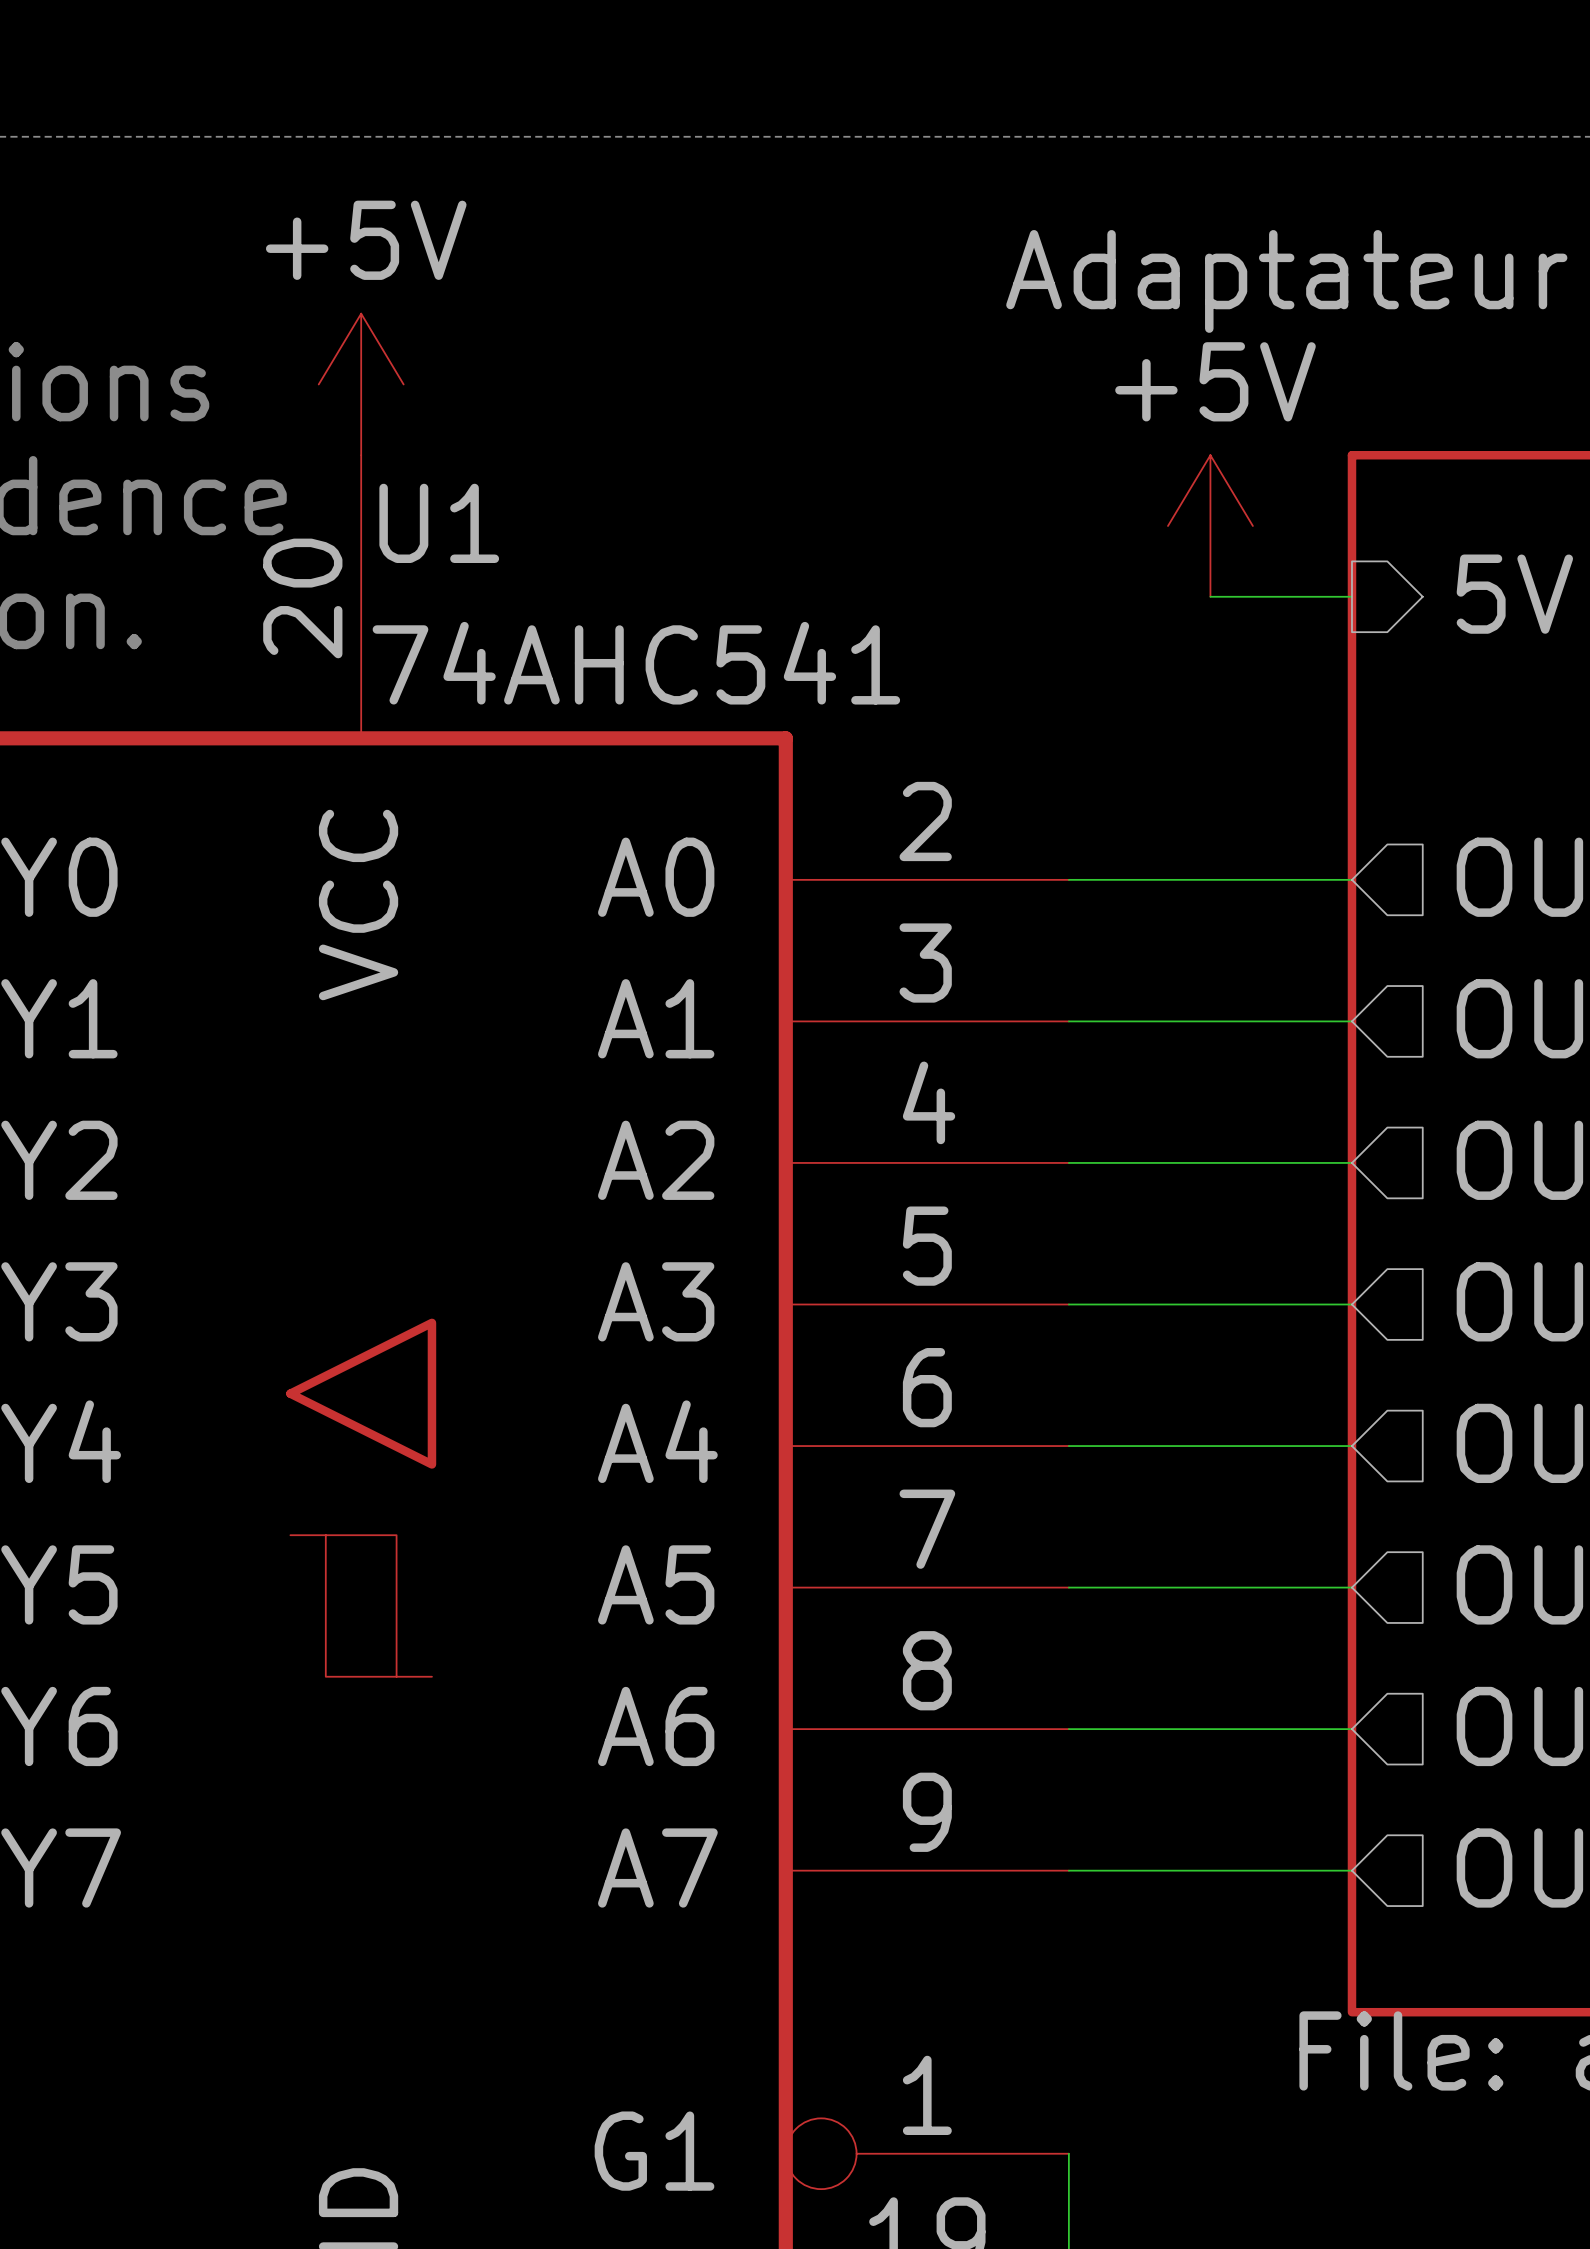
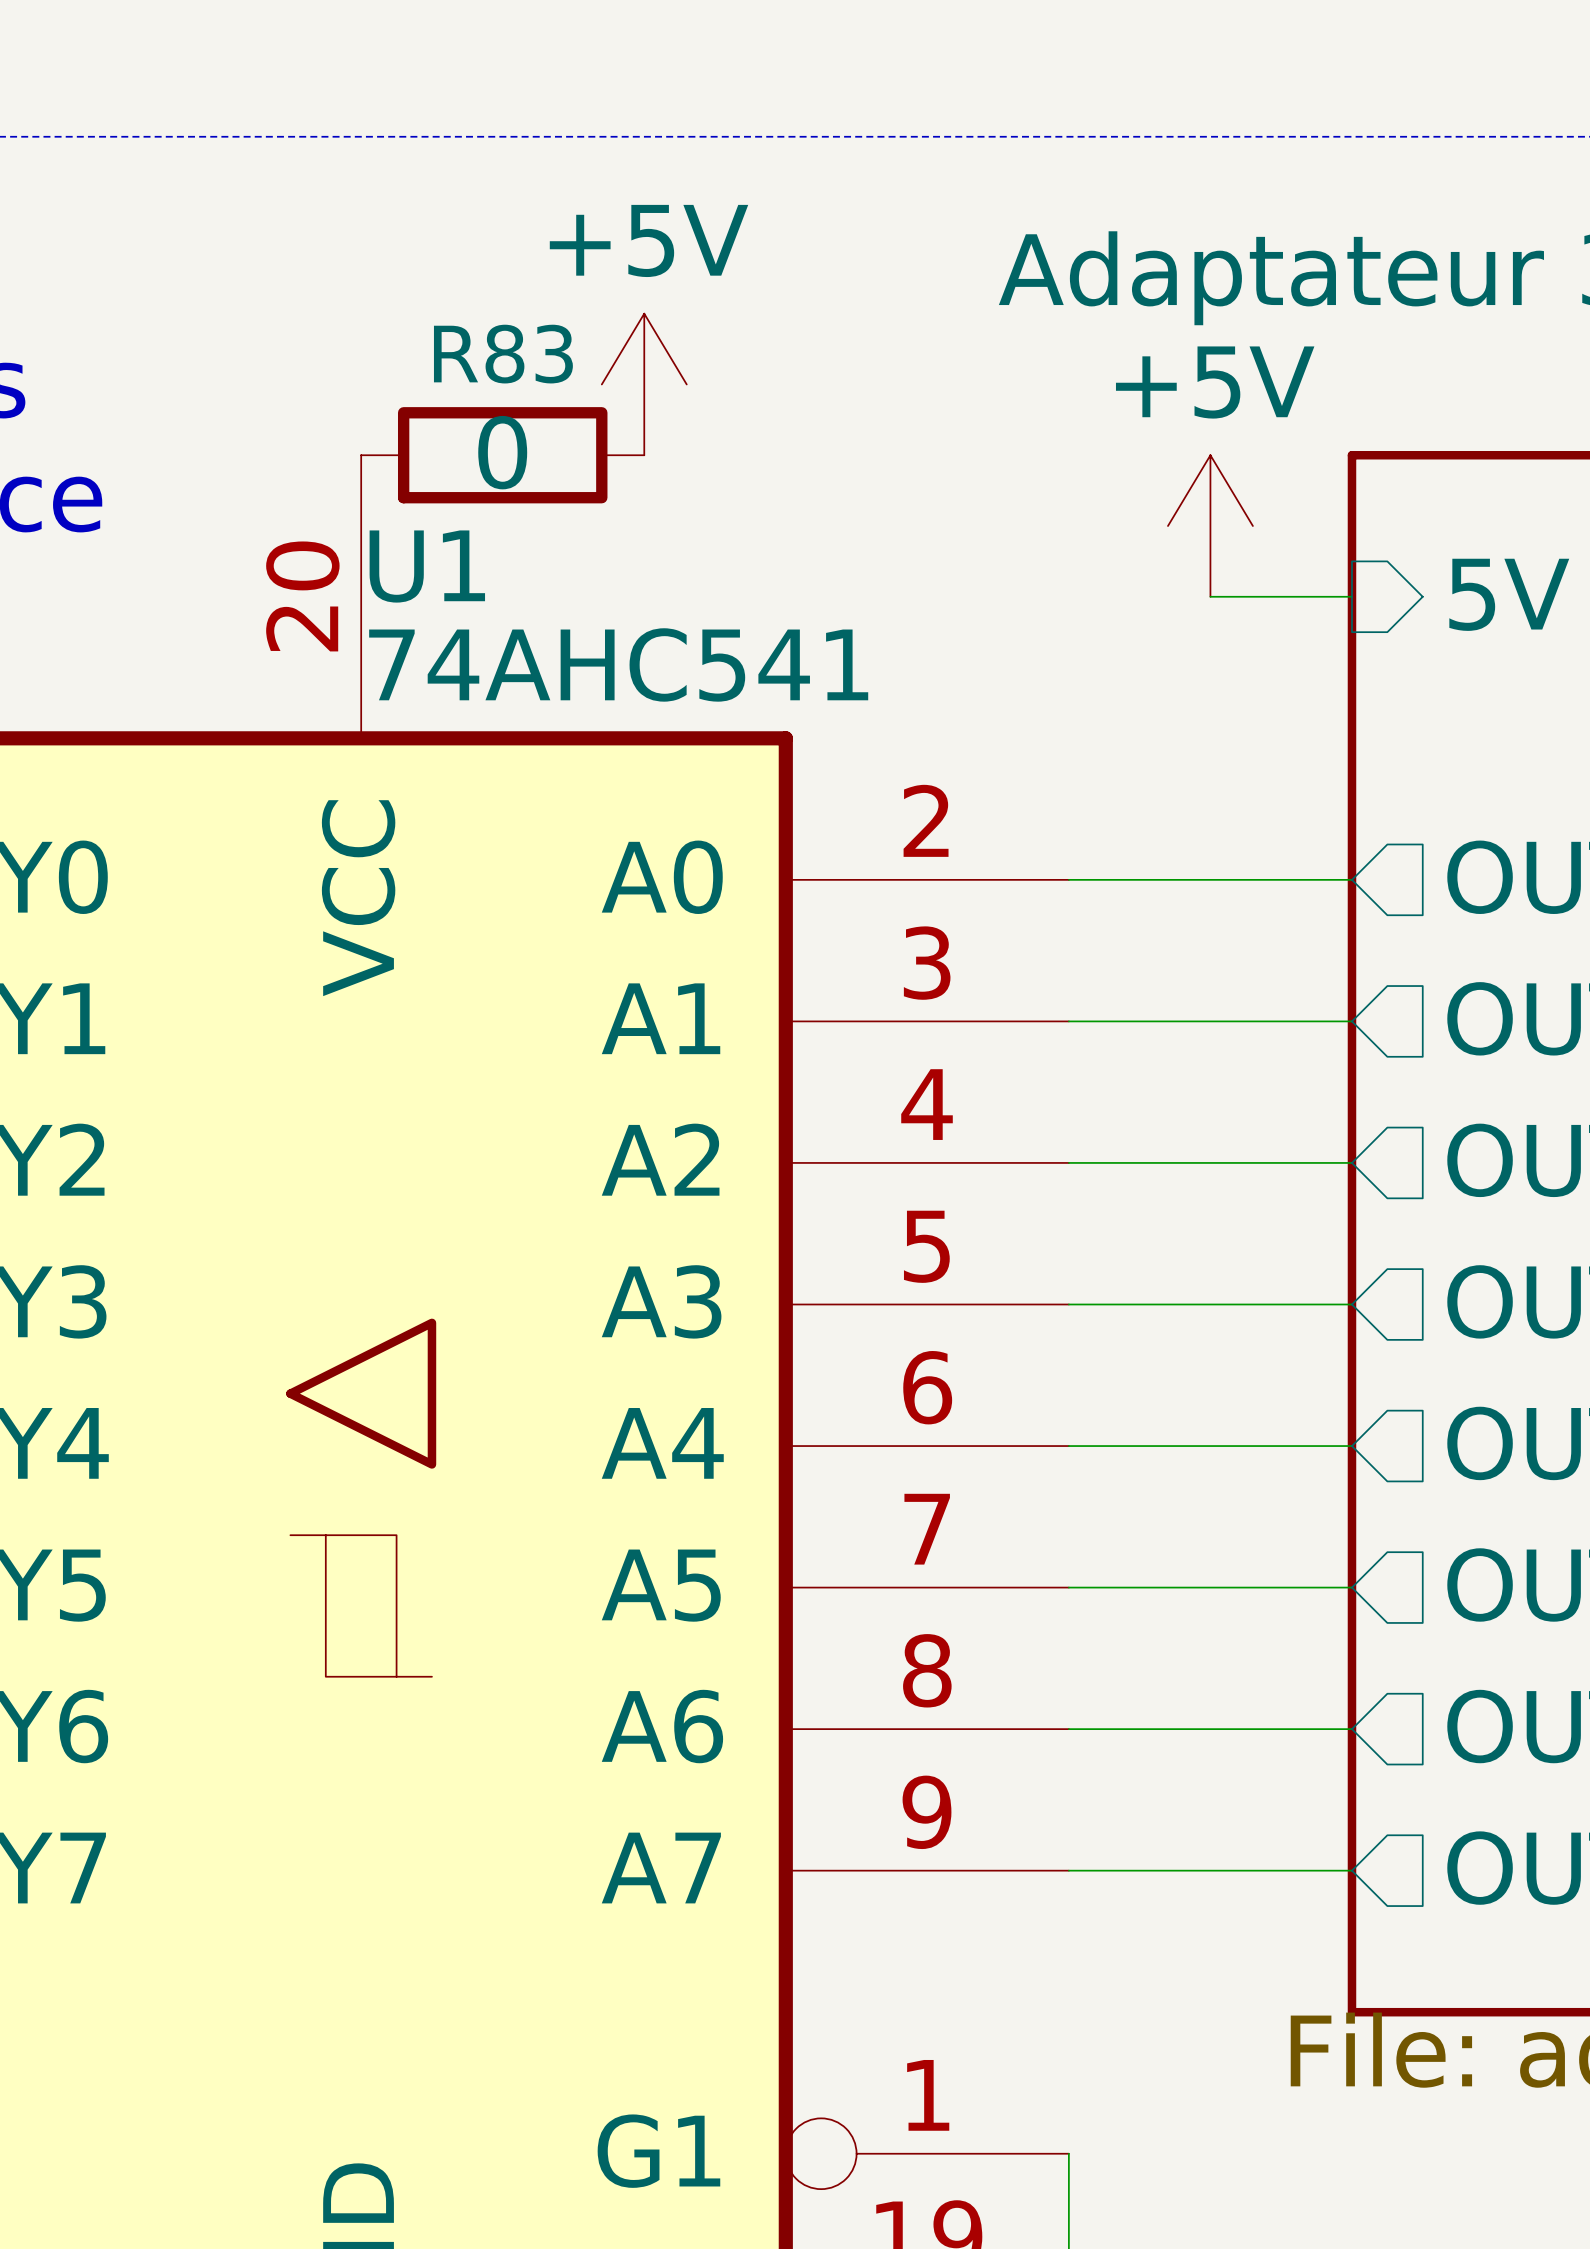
power symbol position: +5V (361, 384) -> +5V (644, 384)
R83: none -> 0 (502, 455)
U1 name position: U1 (439, 523) -> U1 (427, 566)

